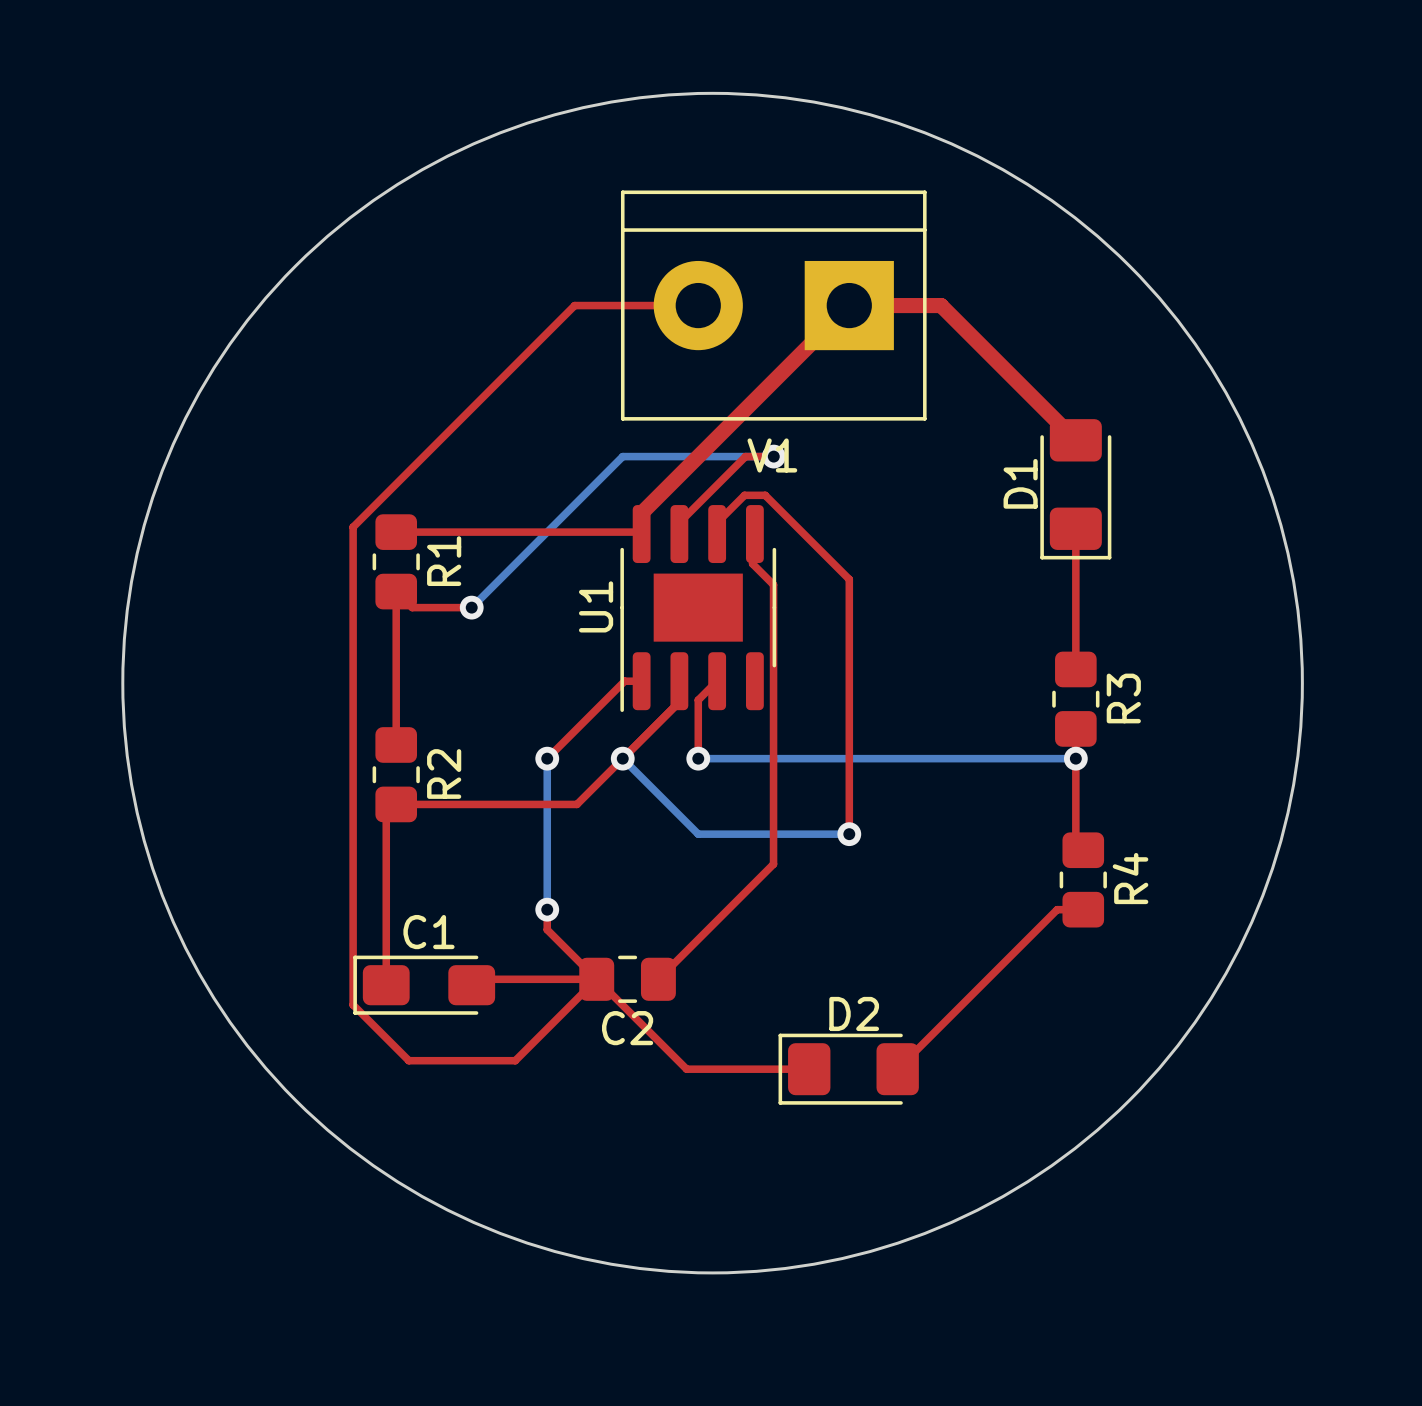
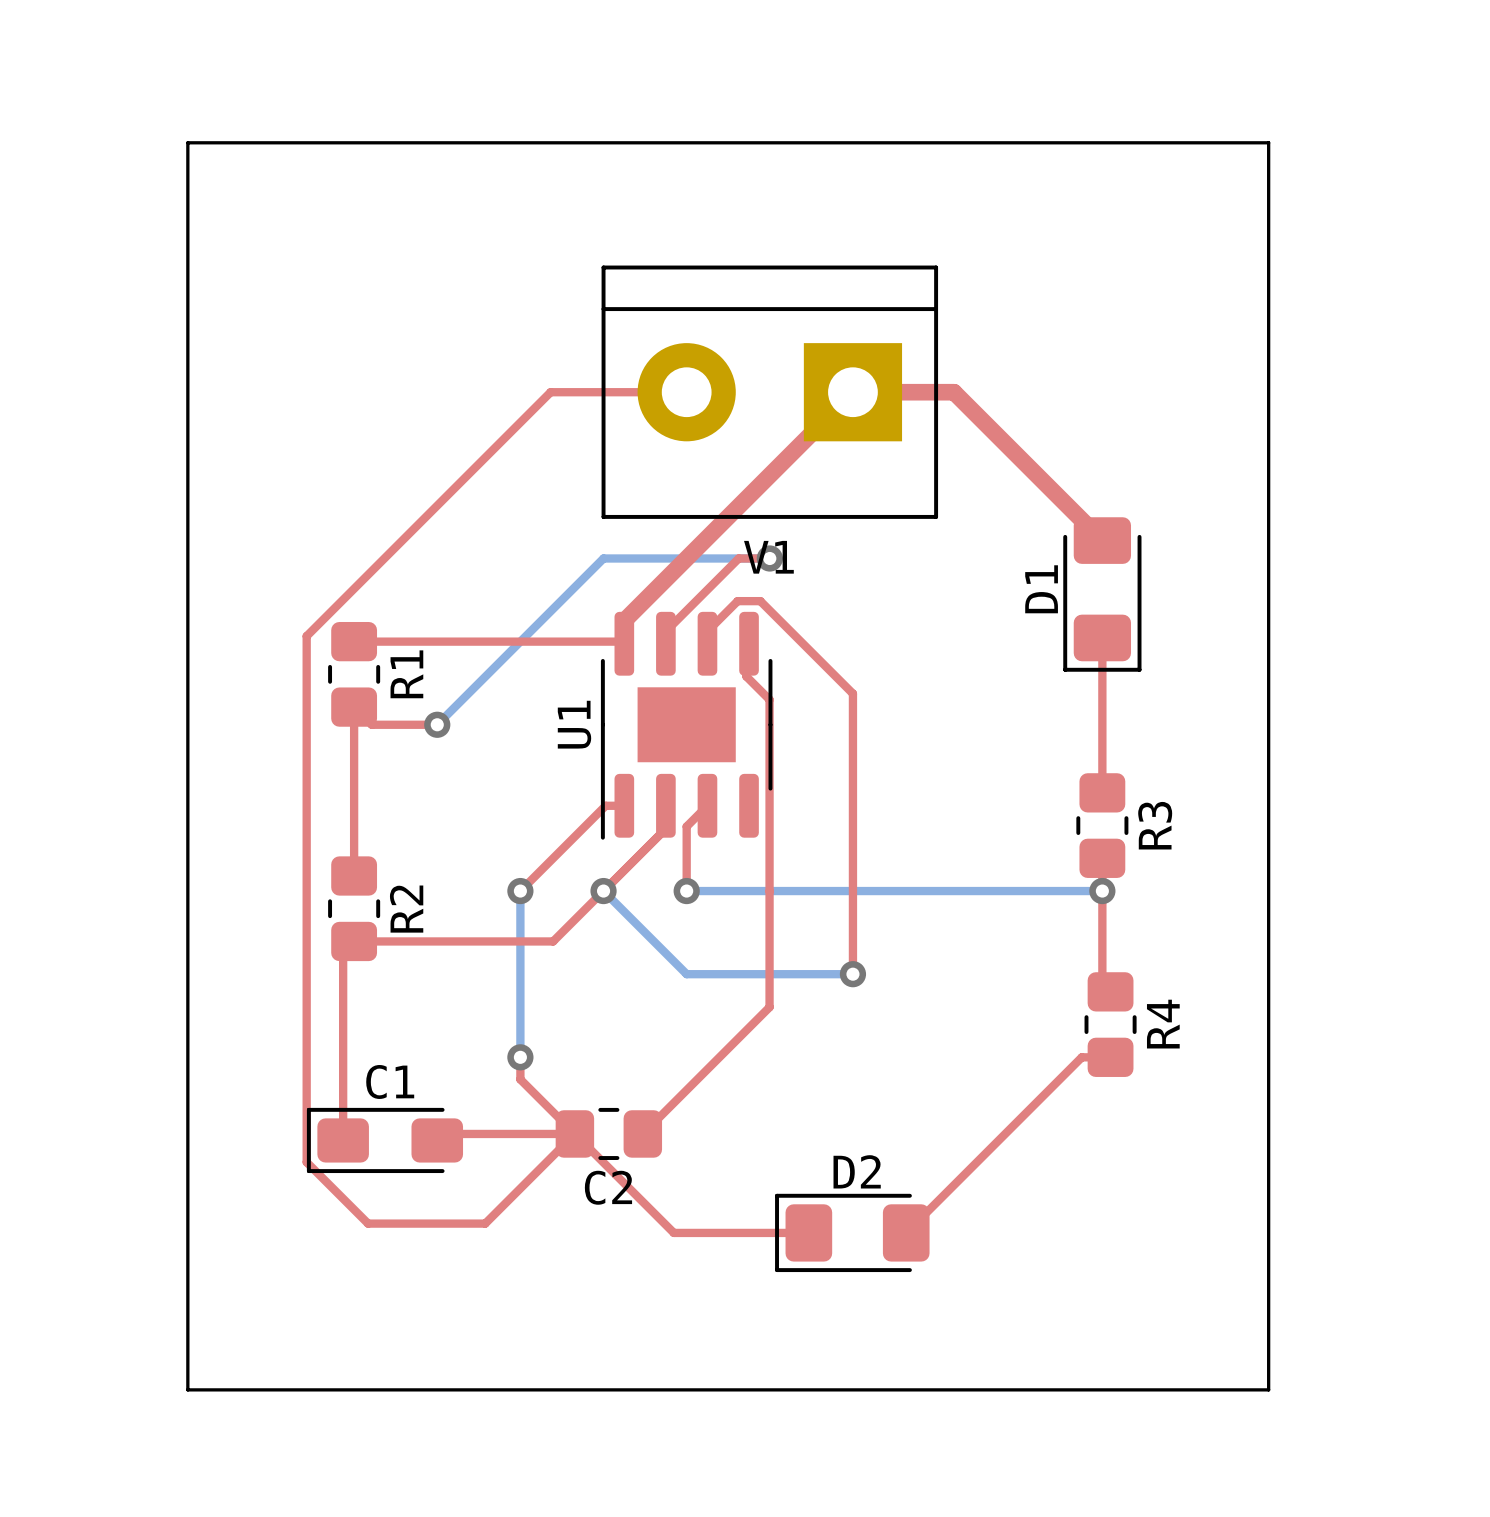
board edge: none -> (187, 142) (1268, 142) (1268, 1389) (187, 1389) (187, 142)
round board edge: [121, 91, 1304, 1275] -> none

